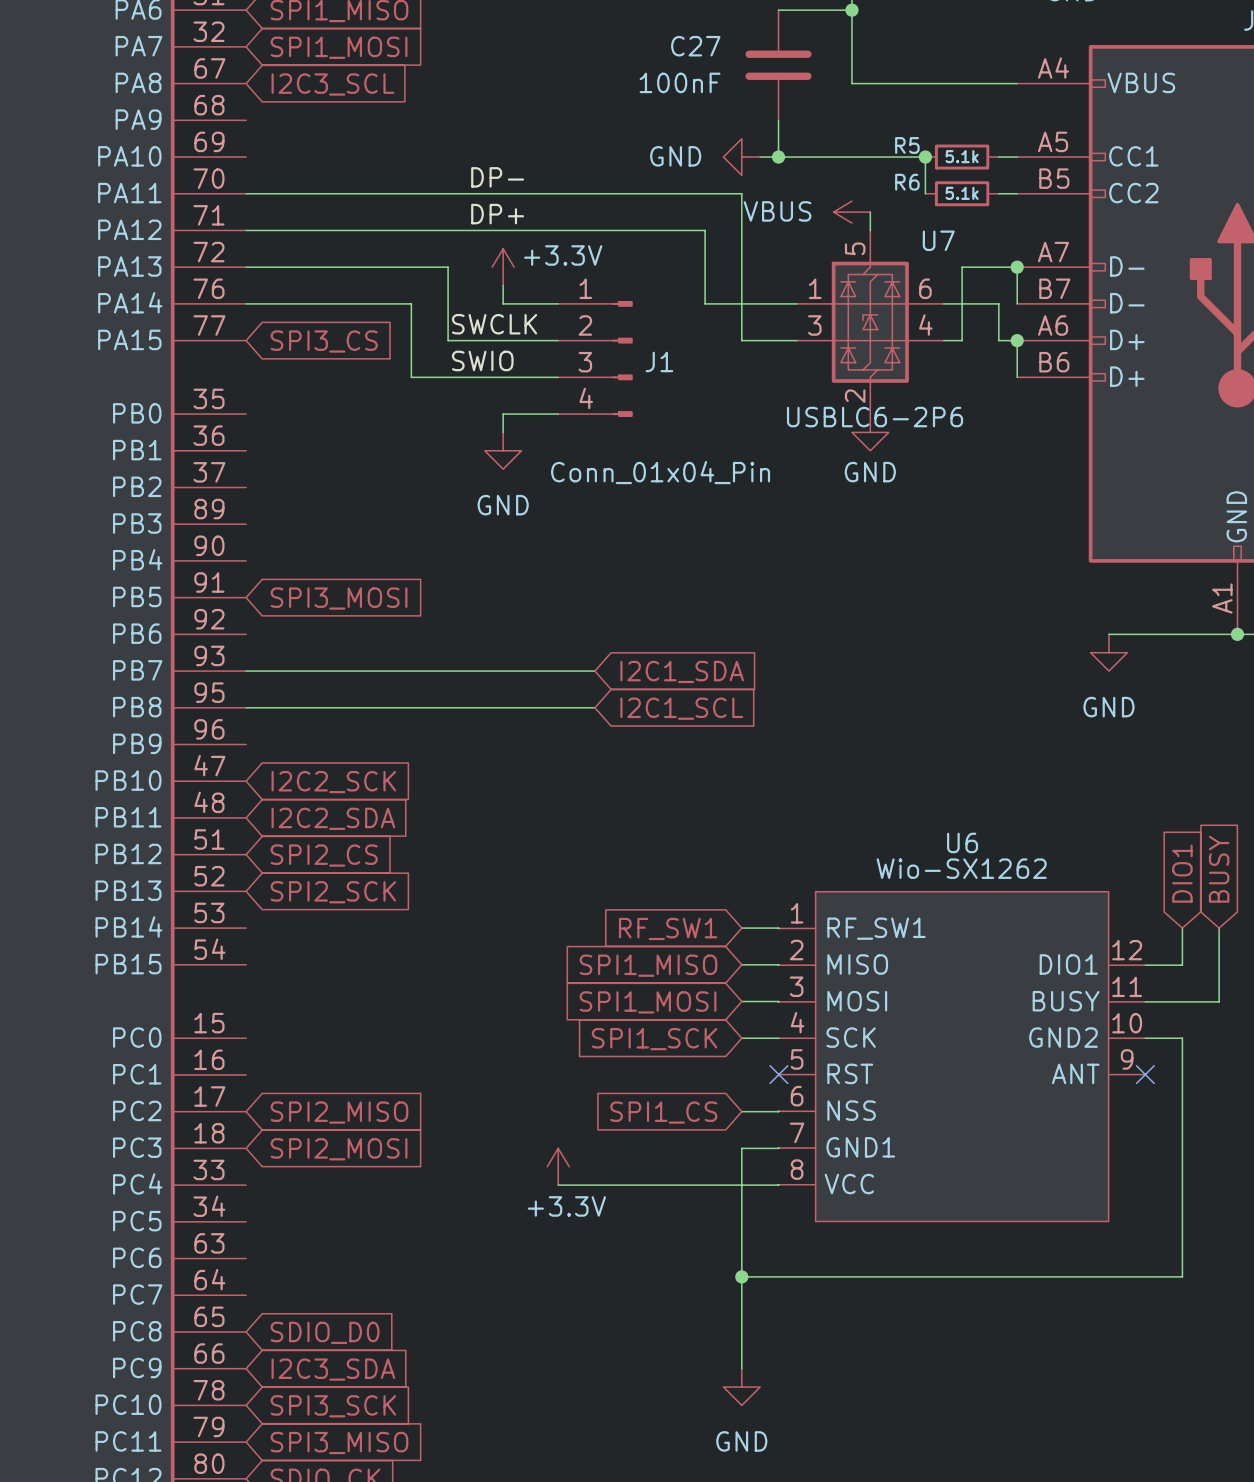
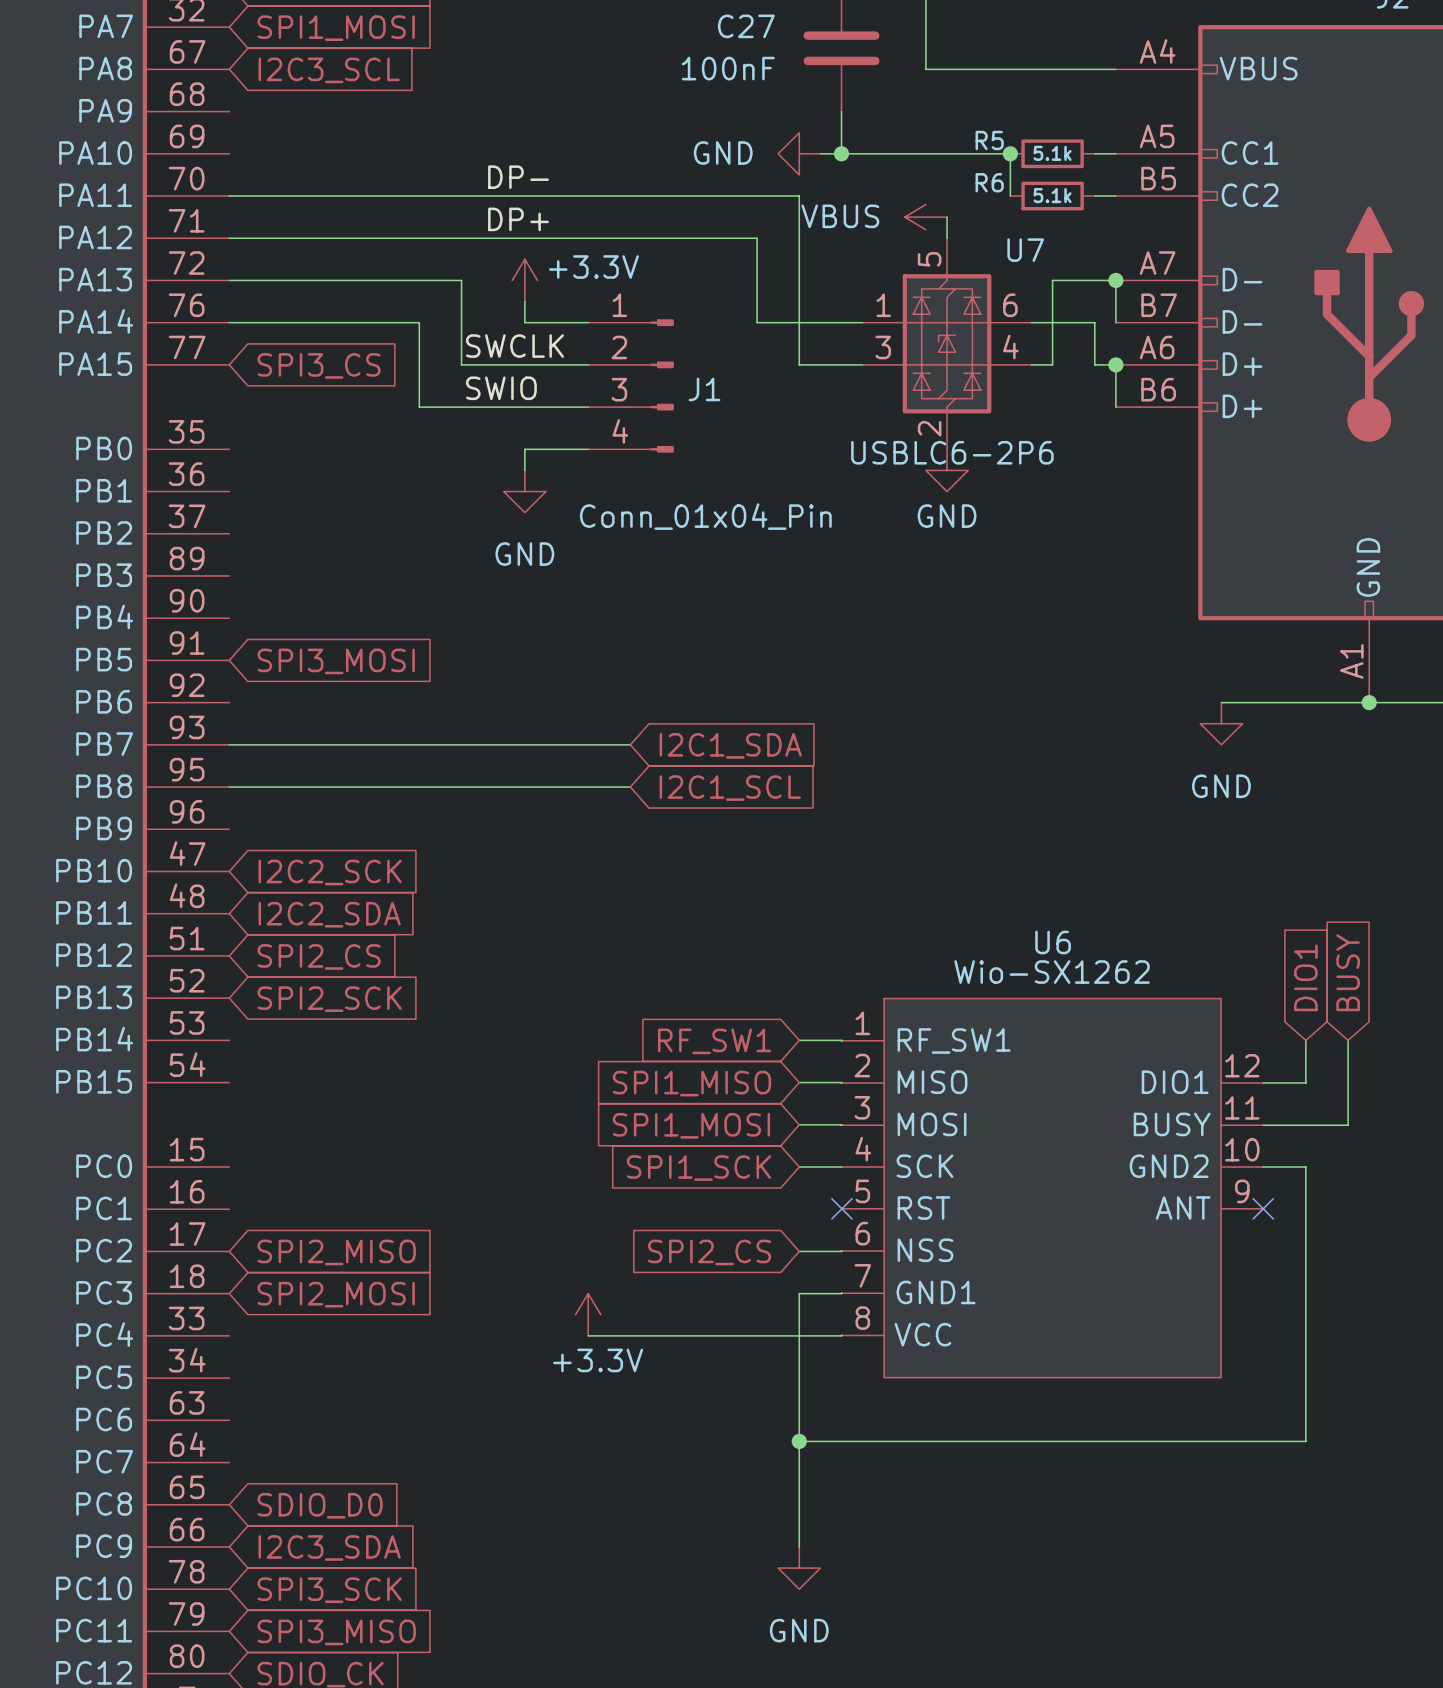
global label: SPI1_CS (663, 1112) -> SPI2_CS (709, 1252)

